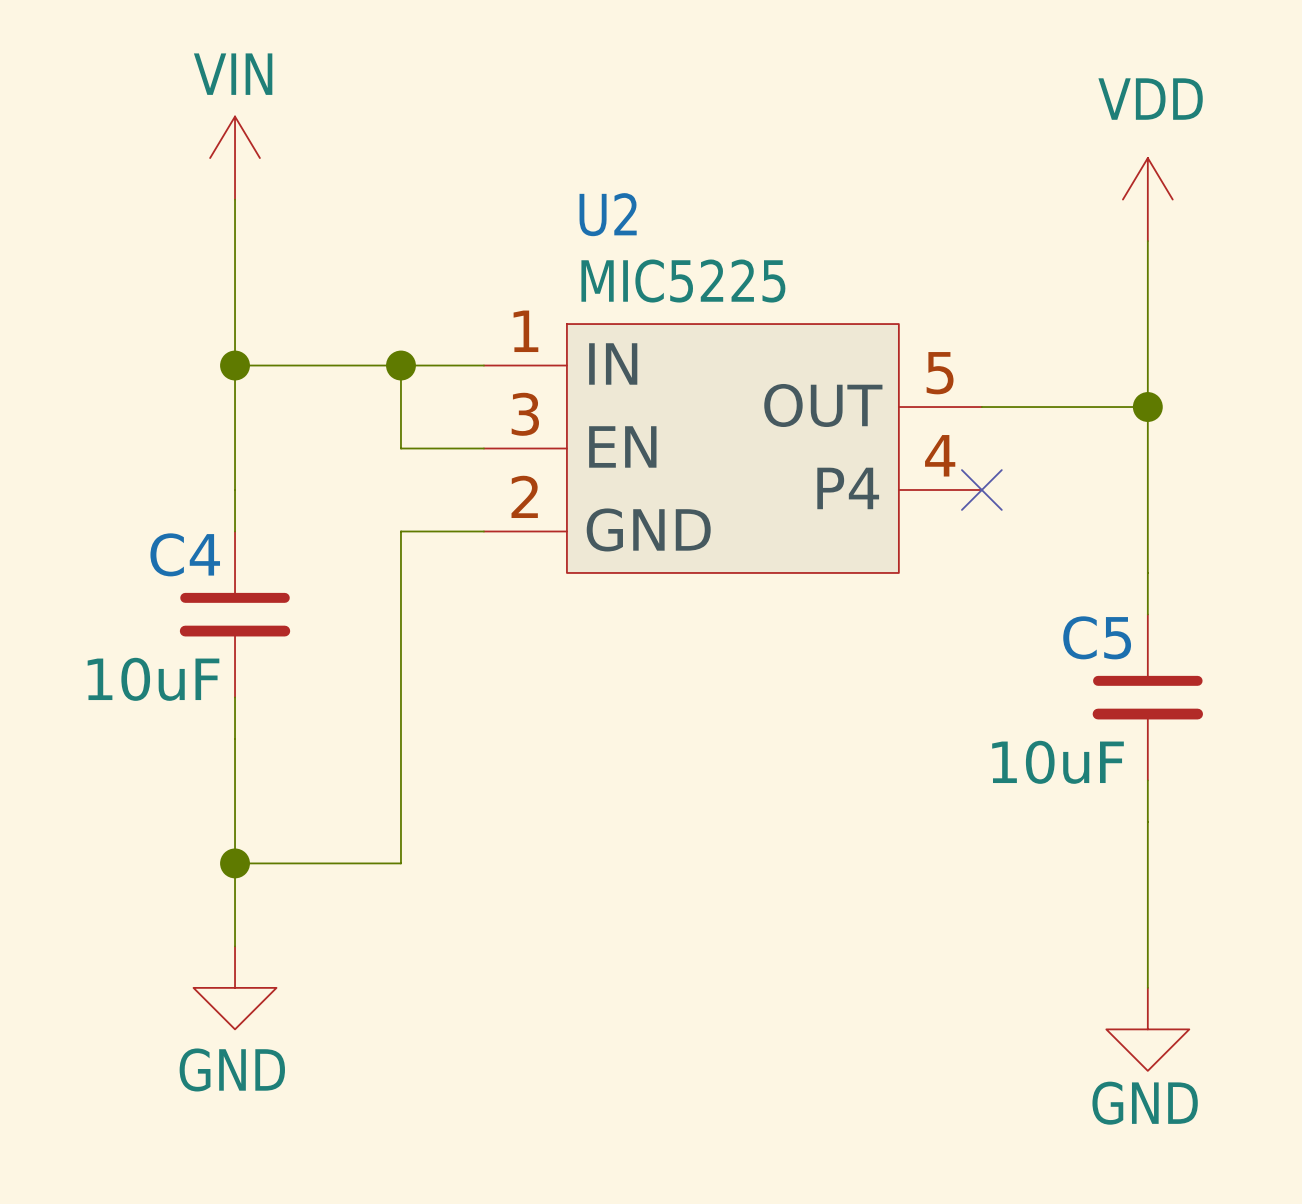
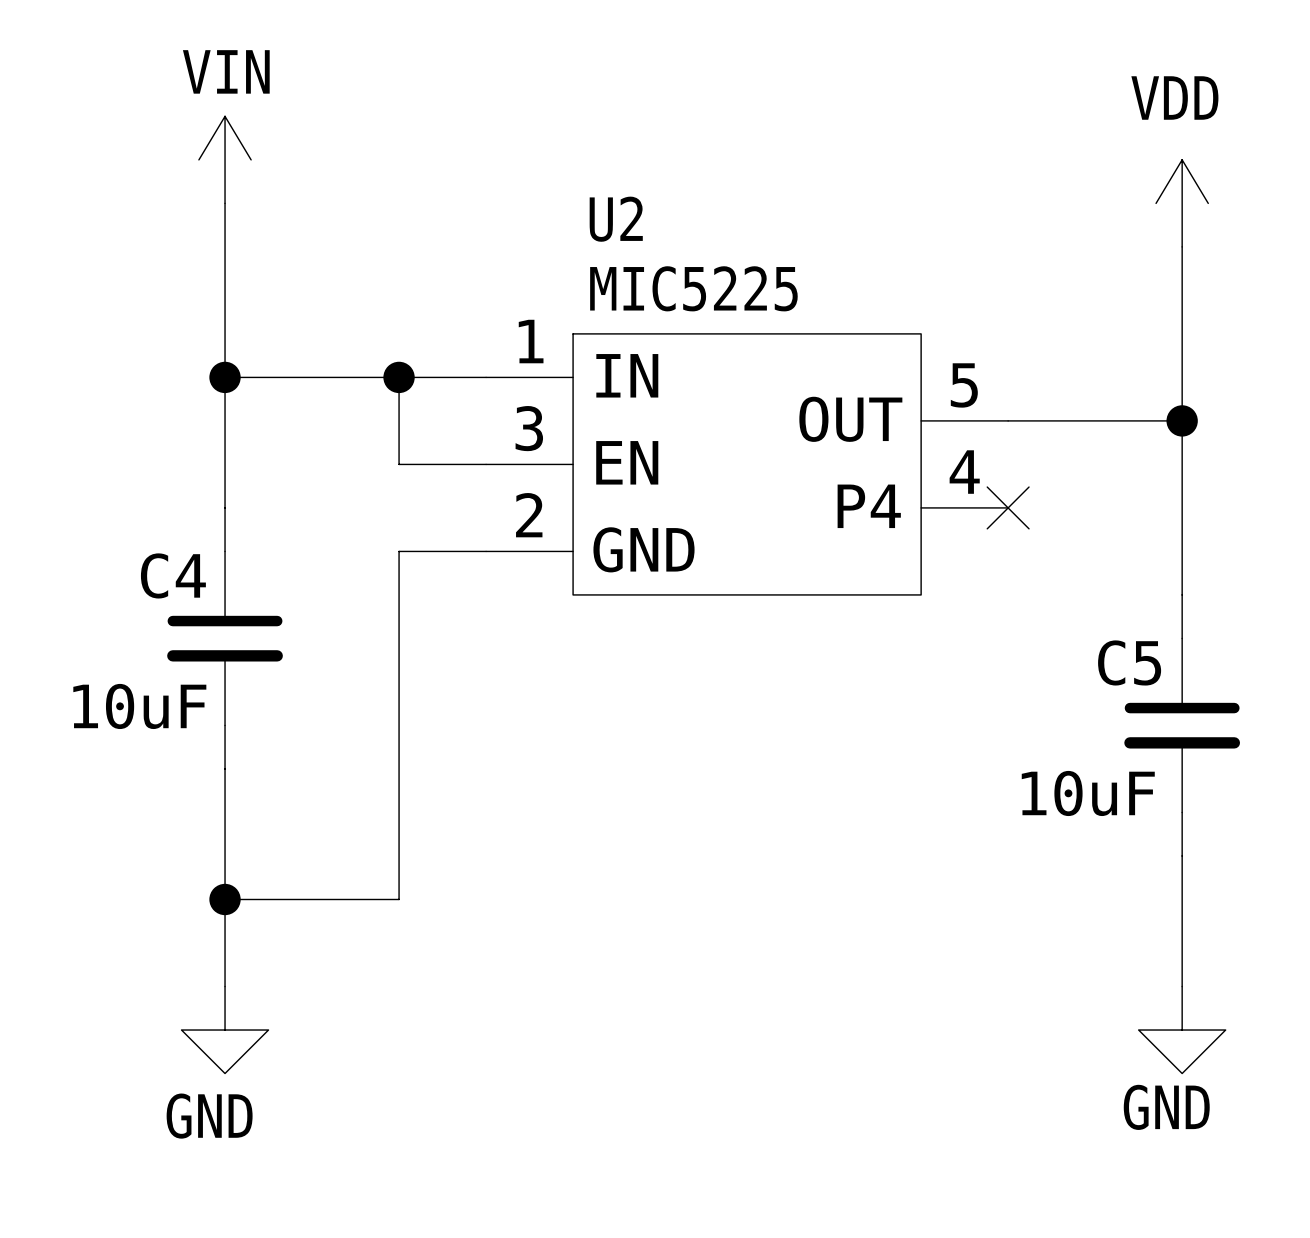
power symbol position: GND (1147, 1029) -> GND (1182, 1030)

